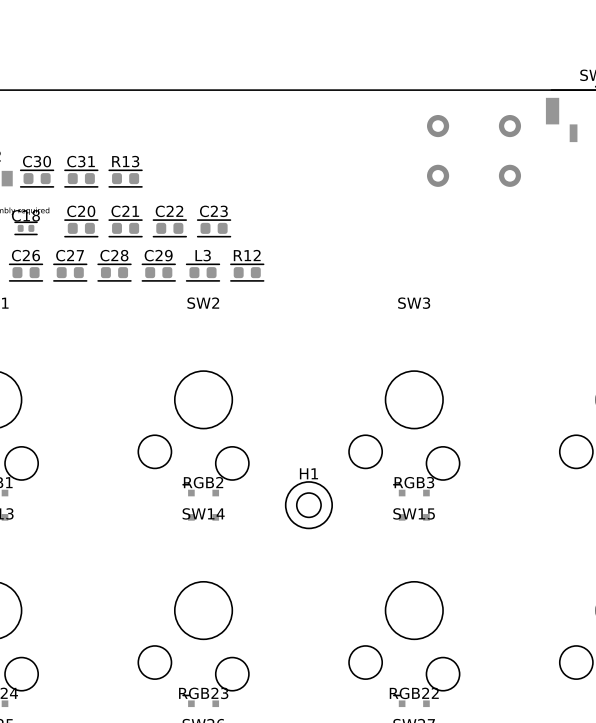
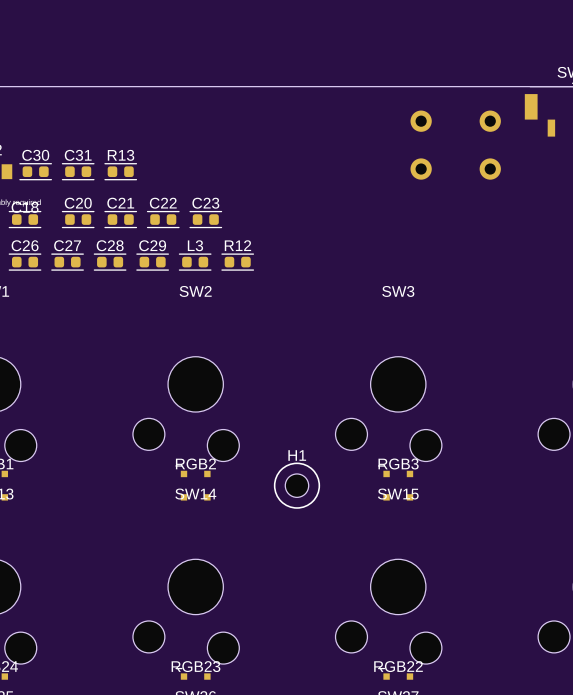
C18 footprint: [14, 221, 38, 236] -> [8, 210, 42, 229]

